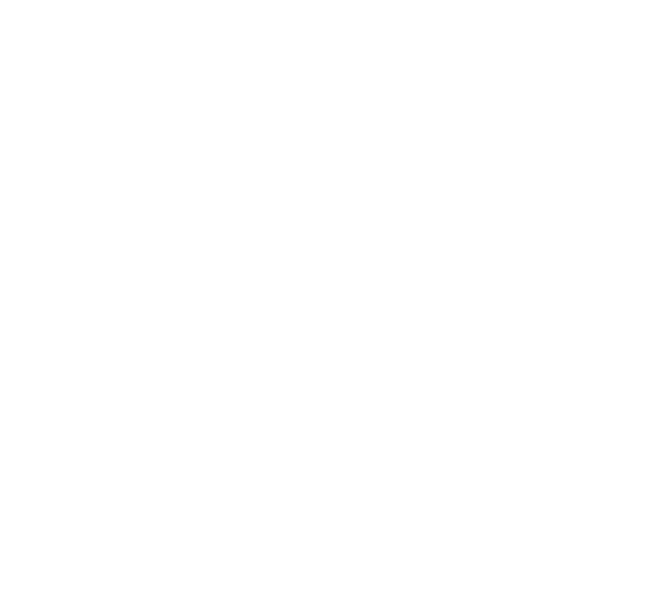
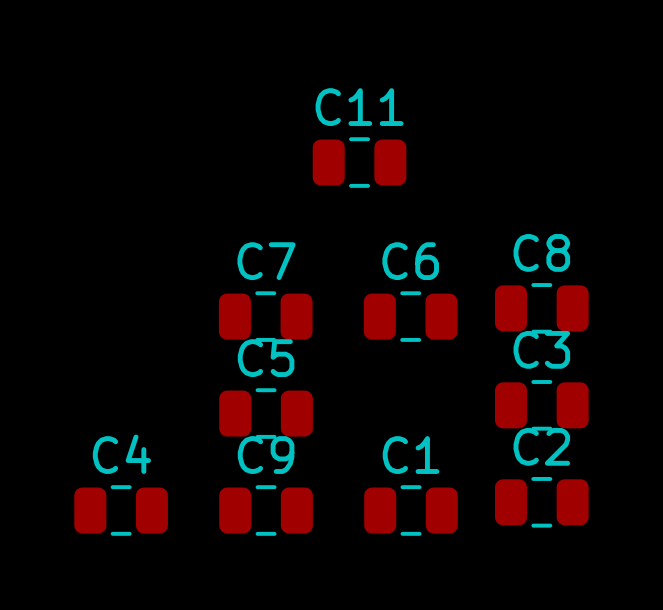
C11: none -> (359, 162)
C8: none -> (541, 308)
C7: none -> (265, 316)
C6: none -> (410, 316)
C3: none -> (541, 405)
C5: none -> (266, 413)
C2: none -> (541, 502)
C4: none -> (121, 510)
C9: none -> (266, 510)
C1: none -> (411, 510)

